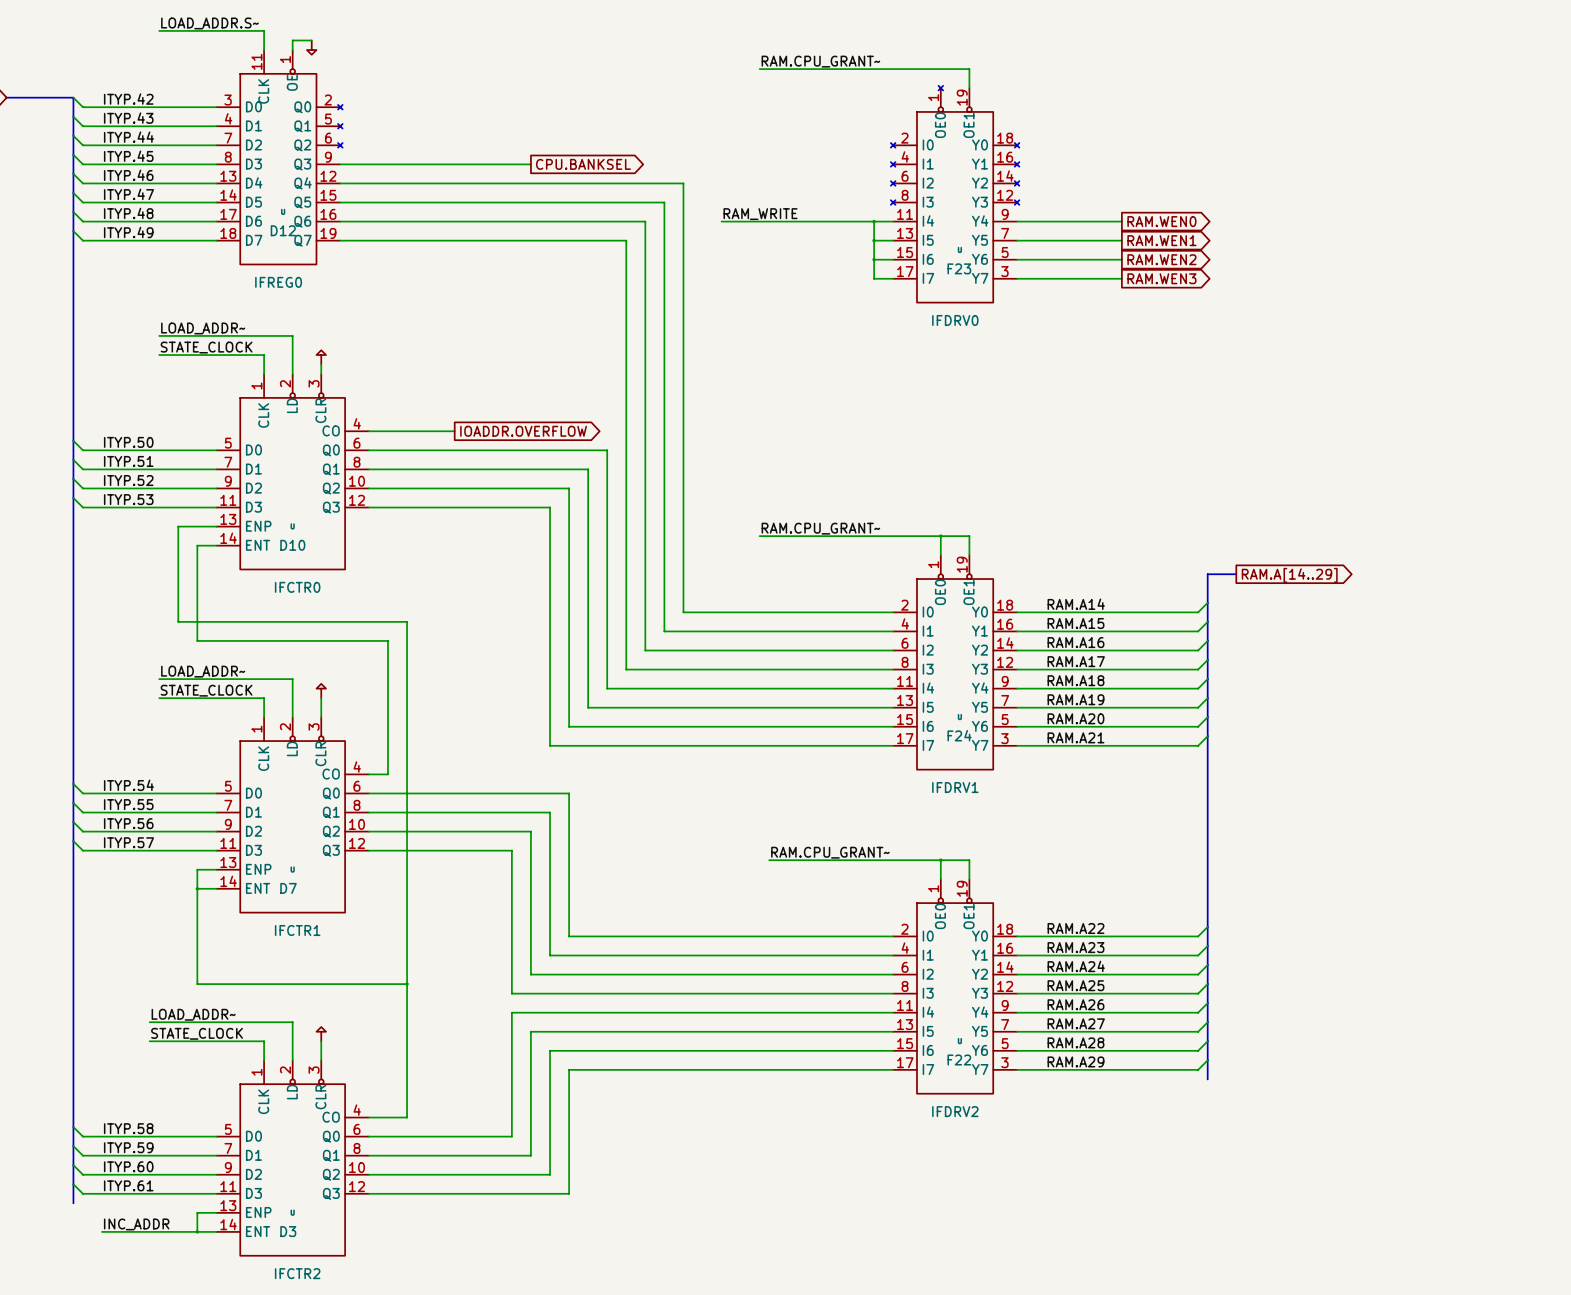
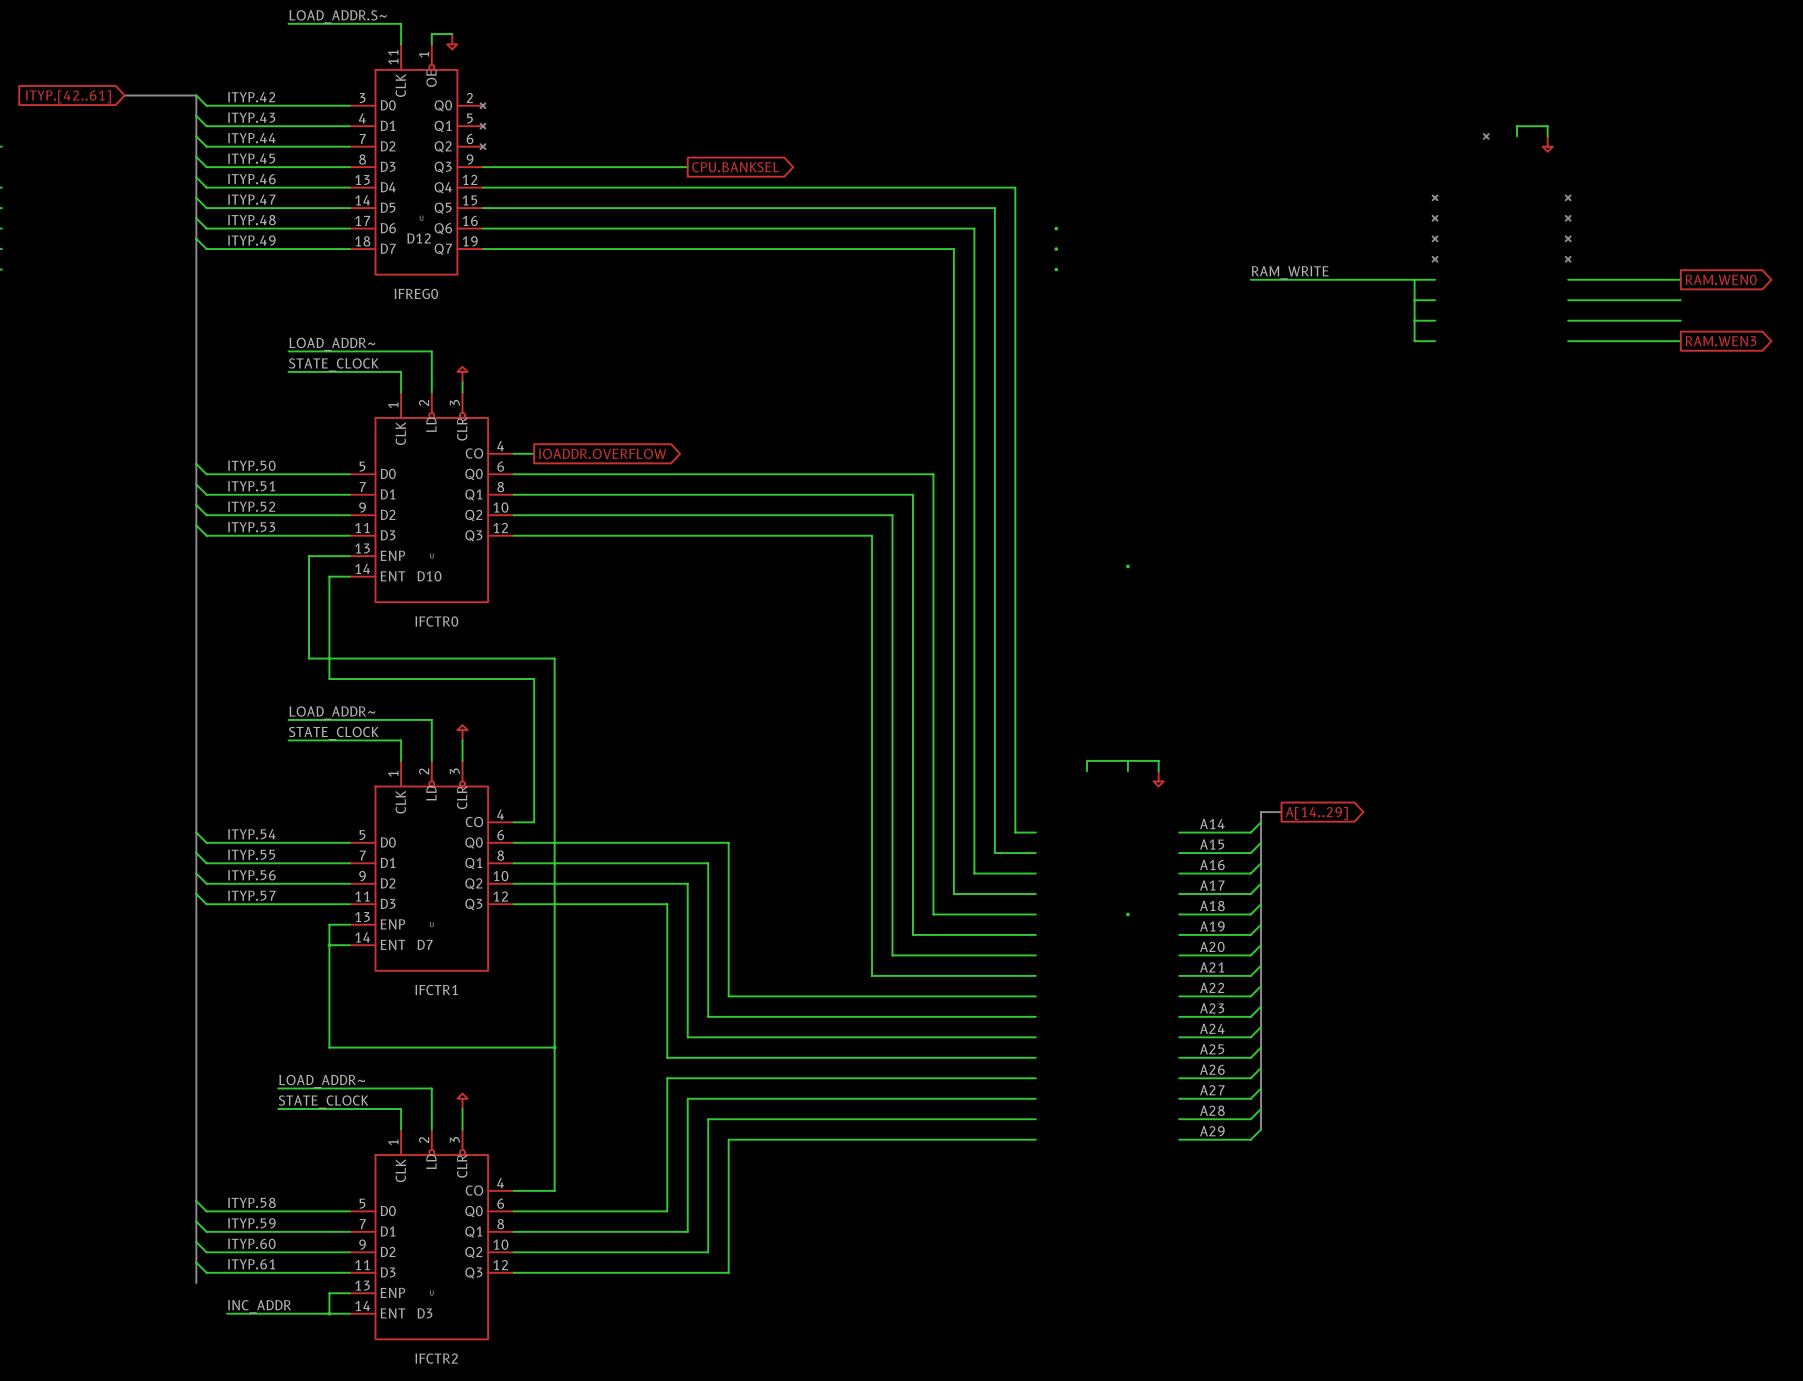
label: RAM.CPU_GRANT~ (820, 61) -> none
wire: (759, 69) (969, 69) (969, 88) -> none
no-connect mark: (940, 88) -> none
no-connect mark: none -> (1486, 136)
wire: none -> (1516, 136) (1516, 126) (1547, 126) (1547, 136)
power symbol: none -> (1547, 144)
no-connect mark: (893, 145) -> none
no-connect mark: (1017, 145) -> none
no-connect mark: (893, 164) -> none
no-connect mark: (1017, 164) -> none
wire: (683, 183) (683, 612) (893, 612) -> (851, 187) (1015, 187) (1015, 832) (1035, 832)
no-connect mark: (893, 183) -> none
no-connect mark: (1017, 183) -> none
no-connect mark: none -> (1435, 197)
no-connect mark: none -> (1568, 197)
part: (955, 195) -> none
wire: (664, 202) (664, 631) (893, 631) -> (831, 208) (994, 208) (994, 853) (1035, 853)
no-connect mark: (893, 202) -> none
no-connect mark: (1017, 202) -> none
no-connect mark: none -> (1435, 218)
no-connect mark: none -> (1568, 218)
label: RAM_WRITE (760, 214) -> none
wire: (645, 221) (645, 650) (893, 650) -> (810, 228) (892, 228)
wire: (797, 221) (893, 221) -> (974, 228) (974, 873) (1035, 873)
wire: (874, 221) (874, 278) (893, 278) -> none
wire: (1017, 221) (1121, 221) -> none
global label: RAM.WEN0 (1161, 221) -> none
no-connect mark: none -> (1435, 238)
no-connect mark: none -> (1568, 238)
wire: (626, 240) (626, 669) (893, 669) -> (790, 249) (953, 249) (953, 894) (1035, 894)
wire: (874, 240) (893, 240) -> none
wire: (1017, 240) (1121, 240) -> none
global label: RAM.WEN1 (1161, 240) -> none
no-connect mark: none -> (1435, 259)
no-connect mark: none -> (1568, 259)
wire: (874, 259) (893, 259) -> none
wire: (1017, 259) (1121, 259) -> none
global label: RAM.WEN2 (1161, 259) -> none
label: none -> RAM_WRITE (1290, 272)
wire: none -> (1250, 279) (1435, 279)
wire: none -> (1414, 279) (1414, 341) (1435, 341)
wire: none -> (1568, 279) (1680, 279)
global label: none -> RAM.WEN0 (1721, 279)
wire: (1017, 278) (1121, 278) -> none
global label: RAM.WEN3 (1161, 278) -> none
wire: none -> (1414, 300) (1435, 300)
wire: none -> (1568, 300) (1680, 300)
wire: none -> (1414, 320) (1435, 320)
wire: none -> (1568, 320) (1680, 320)
wire: none -> (1568, 341) (1680, 341)
global label: none -> RAM.WEN3 (1721, 341)
wire: (387, 431) (454, 431) -> none
global label position: IOADDR.OVERFLOW (523, 431) -> IOADDR.OVERFLOW (602, 453)
wire: (607, 450) (607, 688) (893, 688) -> (769, 474) (933, 474) (933, 914) (943, 914)
wire: (588, 469) (588, 707) (893, 707) -> (749, 494) (912, 494) (912, 934) (1035, 934)
wire: (569, 488) (569, 726) (893, 726) -> (728, 515) (892, 515) (892, 955) (1035, 955)
wire: (550, 507) (550, 745) (893, 745) -> (708, 535) (872, 535) (872, 975) (1035, 975)
label: RAM.CPU_GRANT~ (820, 528) -> none
wire: (759, 536) (969, 536) (969, 555) -> none
wire: (940, 536) (940, 555) -> none
bus: (1236, 574) (1207, 574) (1207, 1079) -> none
global label: RAM.A[14..29] (1289, 575) -> none
wire: (1207, 602) (1198, 612) (1017, 612) -> none
label: RAM.A14 (1076, 604) -> none
wire: (1207, 621) (1198, 631) (1017, 631) -> none
label: RAM.A15 (1075, 623) -> none
wire: (1207, 640) (1198, 650) (1017, 650) -> none
label: RAM.A16 (1075, 642) -> none
wire: (1207, 660) (1198, 669) (1017, 669) -> none
label: RAM.A17 (1076, 661) -> none
part: (955, 662) -> none
wire: (1207, 679) (1198, 688) (1017, 688) -> none
label: RAM.A18 (1075, 680) -> none
wire: (1207, 698) (1198, 707) (1017, 707) -> none
label: RAM.A19 (1075, 699) -> none
wire: none -> (1127, 760) (1127, 771)
wire: (1207, 717) (1198, 726) (1017, 726) -> none
label: RAM.A20 (1075, 718) -> none
wire: none -> (1087, 771) (1087, 760) (1158, 760) (1158, 771)
power symbol: none -> (1158, 778)
wire: (1207, 736) (1198, 745) (1017, 745) -> none
label: RAM.A21 (1075, 737) -> none
bus: none -> (1281, 812) (1261, 812) (1261, 1129)
global label: none -> A[14..29] (1316, 813)
wire: none -> (1261, 822) (1250, 832) (1179, 832)
label: none -> A14 (1212, 824)
wire: none -> (1261, 842) (1250, 853) (1179, 853)
label: none -> A15 (1212, 844)
wire: none -> (1261, 863) (1250, 873) (1179, 873)
label: none -> A16 (1212, 865)
wire: none -> (1261, 883) (1250, 894) (1179, 894)
label: none -> A17 (1212, 885)
wire: none -> (1261, 904) (1250, 914) (1179, 914)
label: RAM.CPU_GRANT~ (830, 852) -> none
label: none -> A18 (1212, 906)
wire: (855, 860) (969, 860) (969, 879) -> none
wire: (940, 860) (940, 879) -> none
wire: none -> (1261, 924) (1250, 934) (1179, 934)
label: none -> A19 (1212, 926)
wire: none -> (1261, 945) (1250, 955) (1179, 955)
label: none -> A20 (1212, 946)
wire: none -> (1261, 965) (1250, 975) (1179, 975)
label: none -> A21 (1212, 967)
wire: (1207, 926) (1198, 936) (1055, 936) -> (1261, 986) (1250, 996)
label: none -> A22 (1212, 987)
label: RAM.A22 (1075, 928) -> none
wire: (855, 936) (893, 936) -> none
wire: (1207, 945) (1198, 955) (1055, 955) -> (1261, 1006) (1250, 1016)
label: none -> A23 (1212, 1008)
label: RAM.A23 (1075, 947) -> none
wire: (855, 955) (893, 955) -> none
wire: (1207, 965) (1198, 974) (1055, 974) -> (1261, 1027) (1250, 1037)
label: none -> A24 (1212, 1028)
label: RAM.A24 (1076, 966) -> none
wire: (855, 974) (893, 974) -> none
wire: (1207, 984) (1198, 993) (1055, 993) -> (1261, 1047) (1250, 1057)
label: none -> A25 (1212, 1049)
label: RAM.A25 (1075, 985) -> none
part: (955, 986) -> none
wire: (855, 993) (893, 993) -> none
wire: (1207, 1003) (1198, 1012) (1055, 1012) -> (1261, 1068) (1250, 1078)
label: none -> A26 (1212, 1069)
label: RAM.A26 (1075, 1004) -> none
wire: (855, 1012) (893, 1012) -> none
wire: (1207, 1022) (1198, 1031) (1055, 1031) -> (1261, 1088) (1250, 1098)
label: none -> A27 (1212, 1090)
label: RAM.A27 (1076, 1023) -> none
wire: (855, 1031) (893, 1031) -> none
wire: (1207, 1041) (1198, 1050) (1055, 1050) -> (1261, 1108) (1250, 1119)
label: none -> A28 (1212, 1110)
label: RAM.A28 (1075, 1042) -> none
wire: (855, 1050) (893, 1050) -> none
wire: (1207, 1060) (1198, 1069) (1055, 1069) -> (1261, 1129) (1250, 1139)
label: none -> A29 (1212, 1131)
label: RAM.A29 (1075, 1061) -> none
wire: (855, 1069) (893, 1069) -> none

